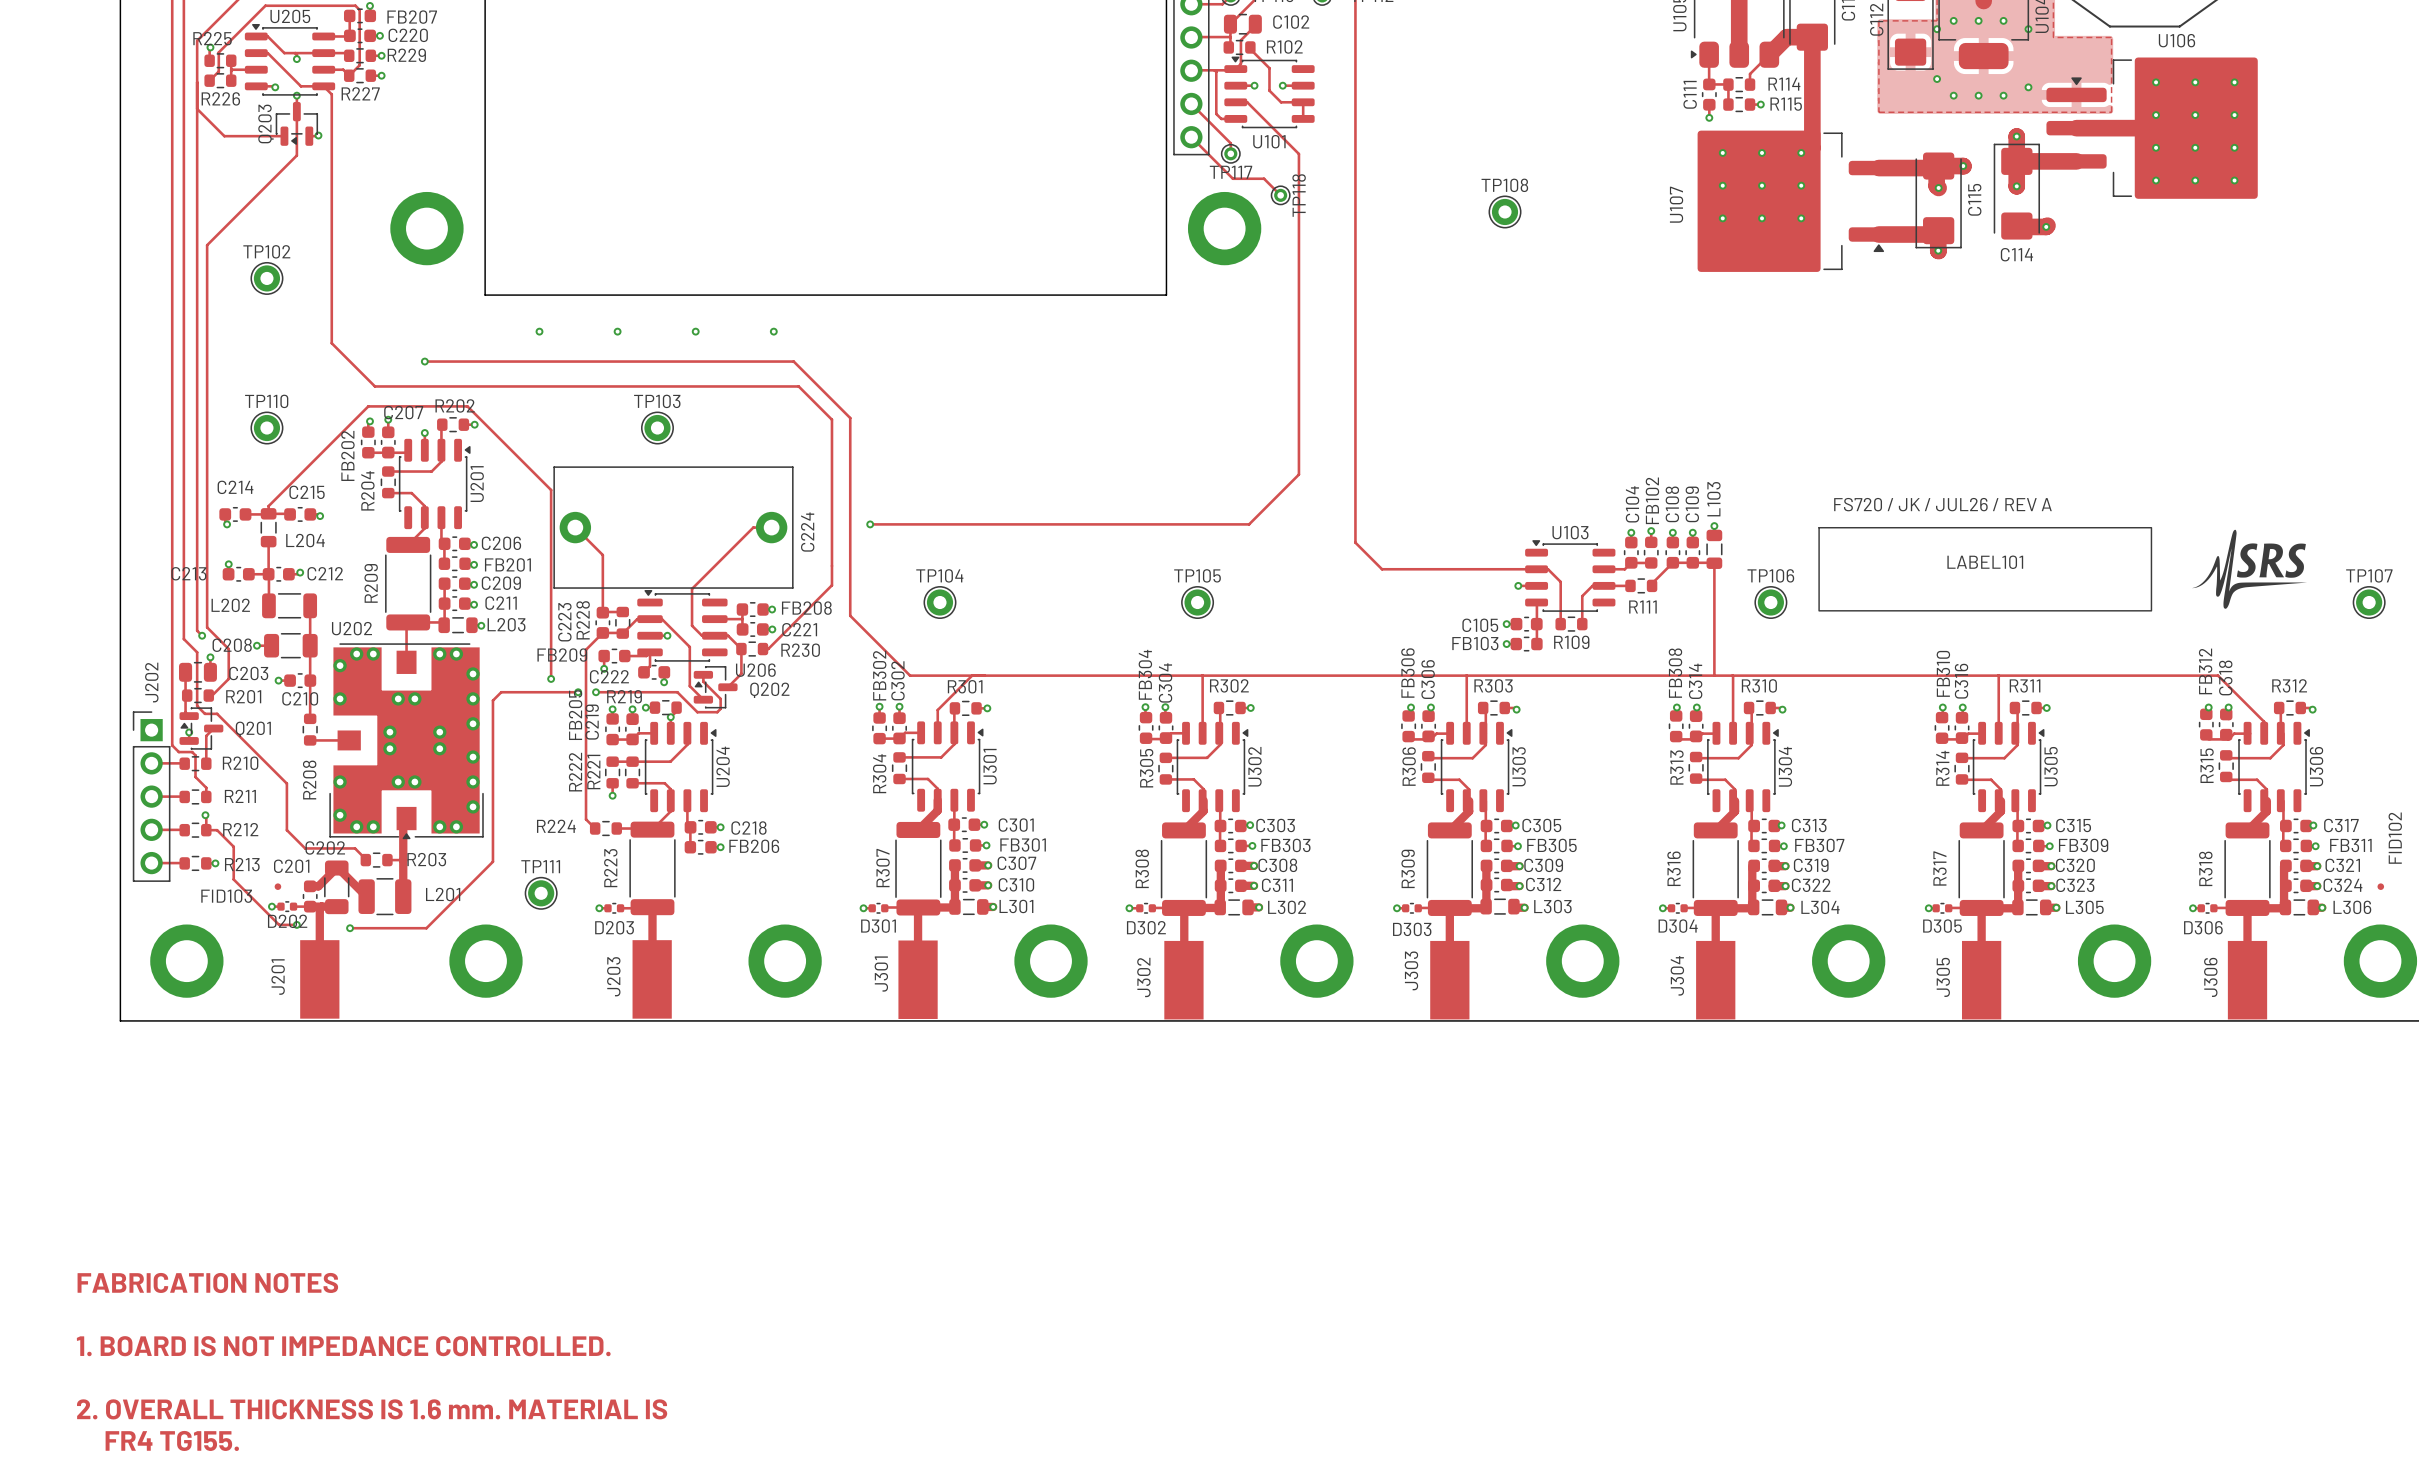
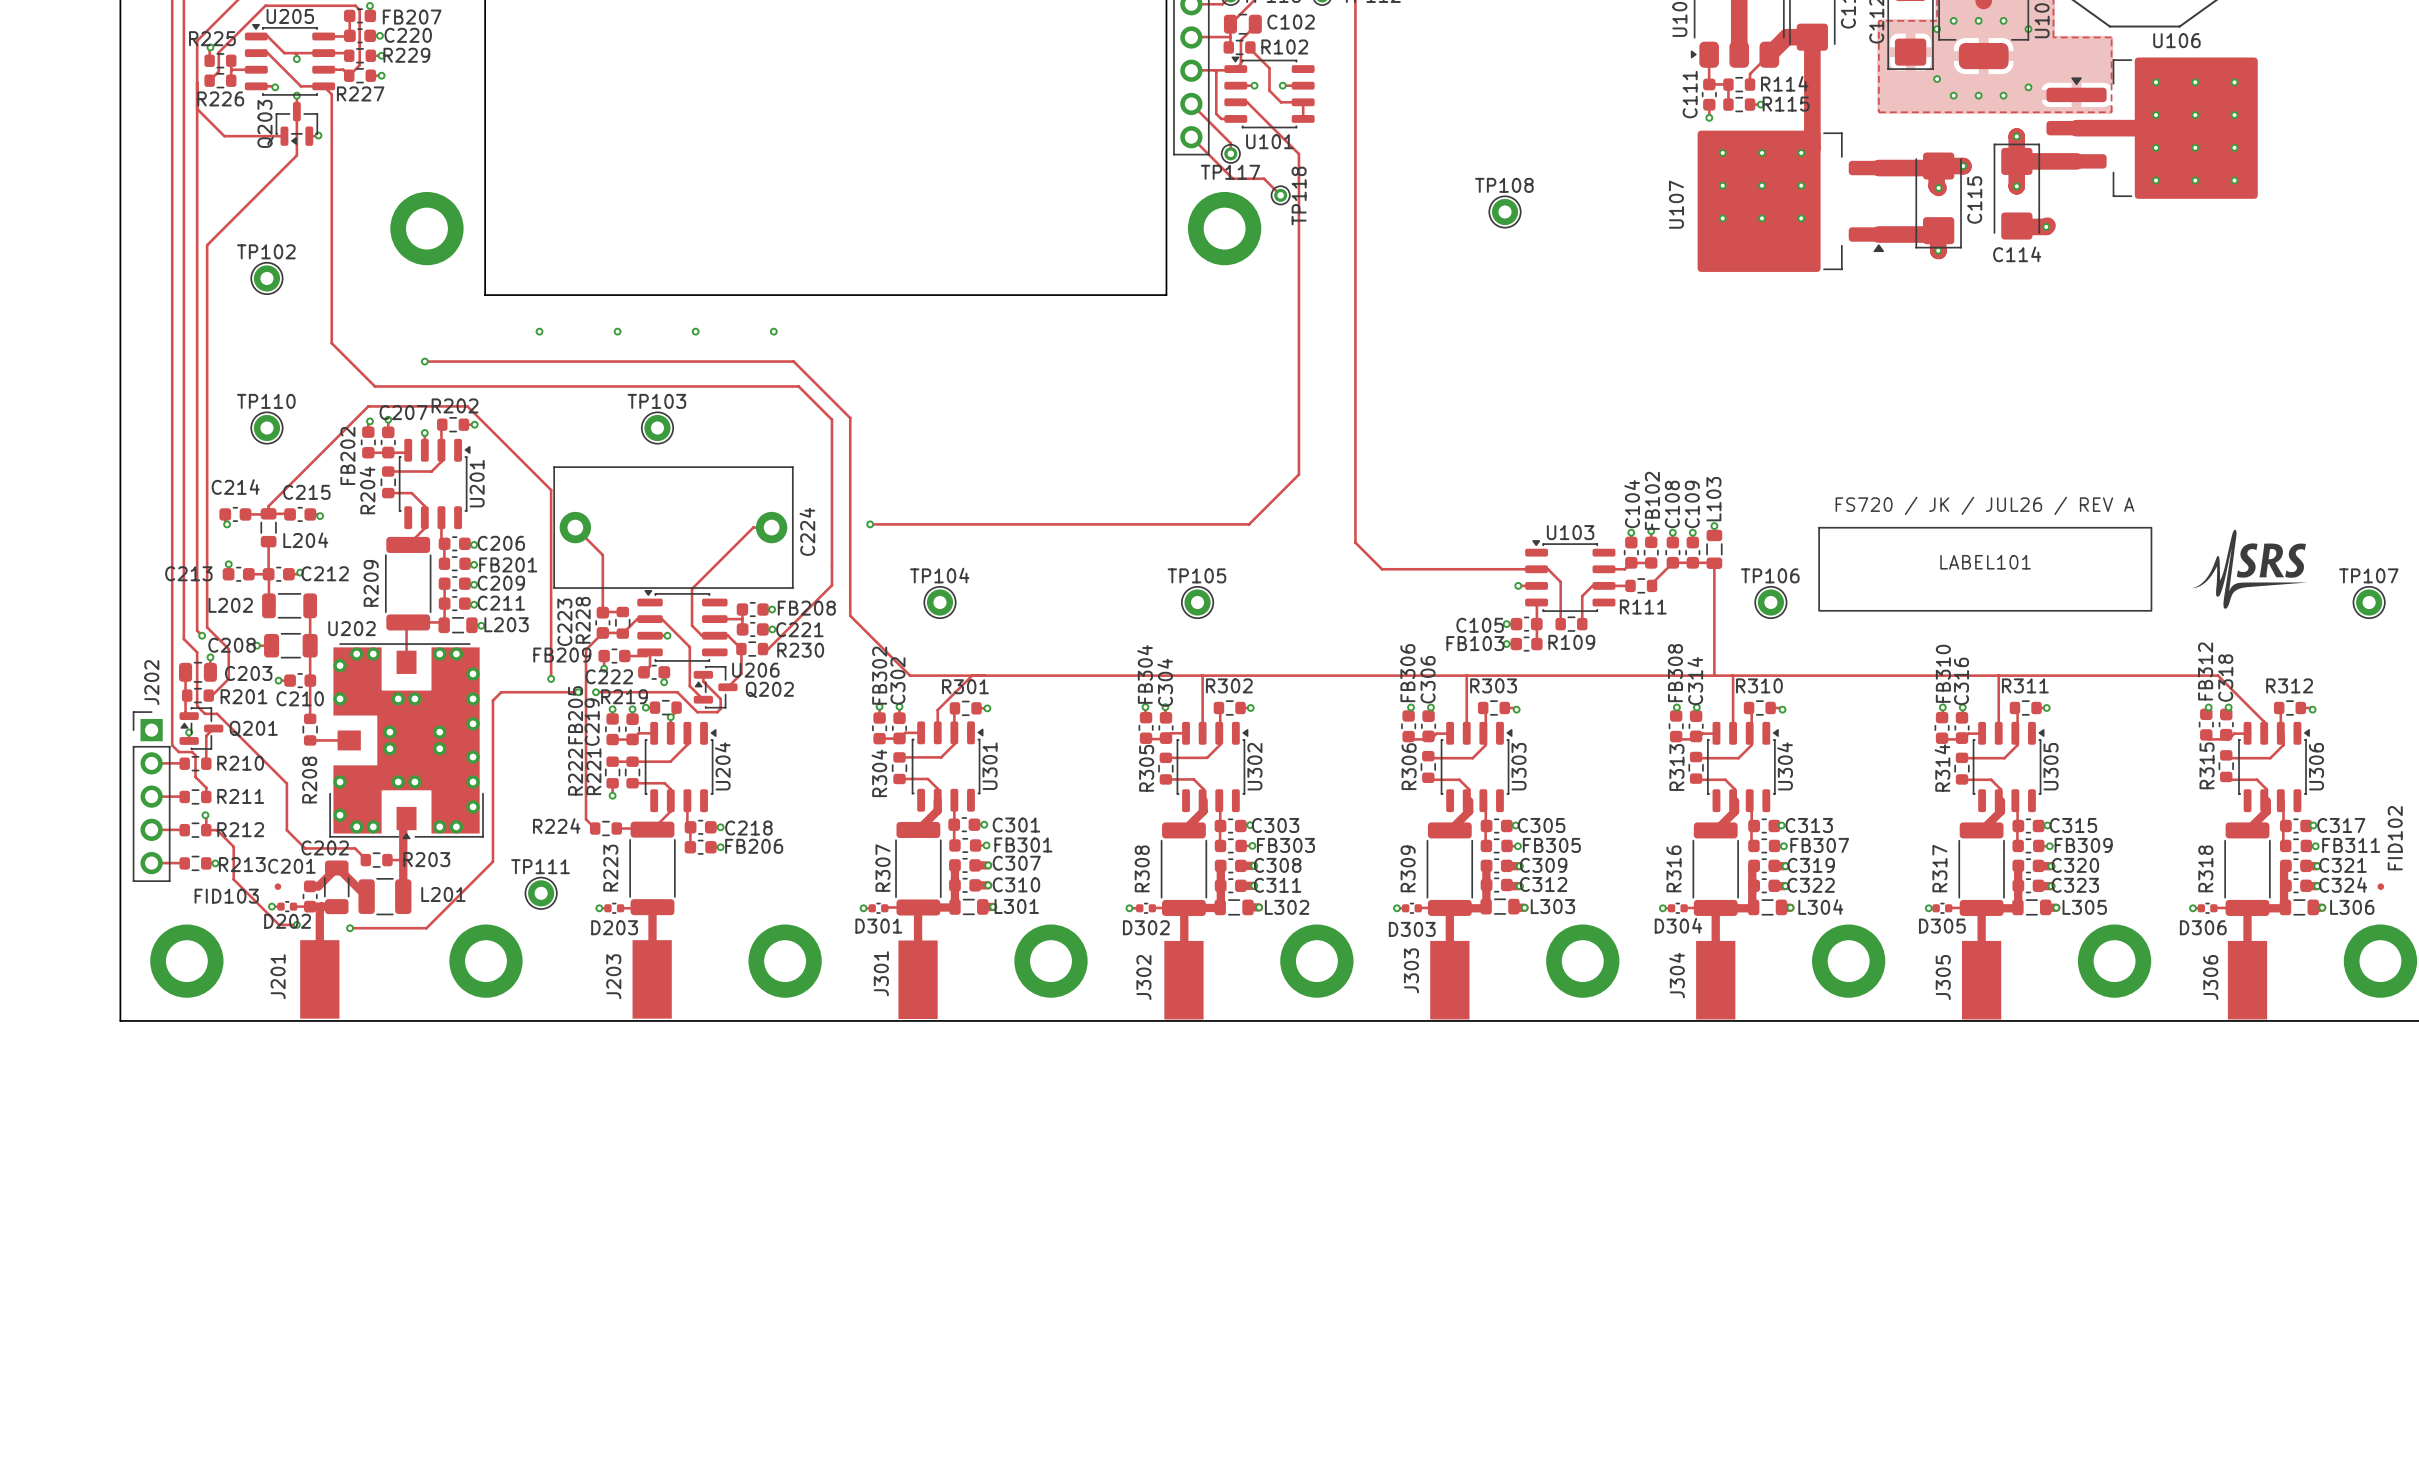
text: FABRICATION NOTES (207, 1282) -> none
text: 1. BOARD IS NOT IMPEDANCE CONTROLLED. (343, 1346) -> none
text: 2. OVERALL THICKNESS IS 1.6 mm. MATERIAL IS (372, 1409) -> none
text: FR4 TG155. (172, 1440) -> none

